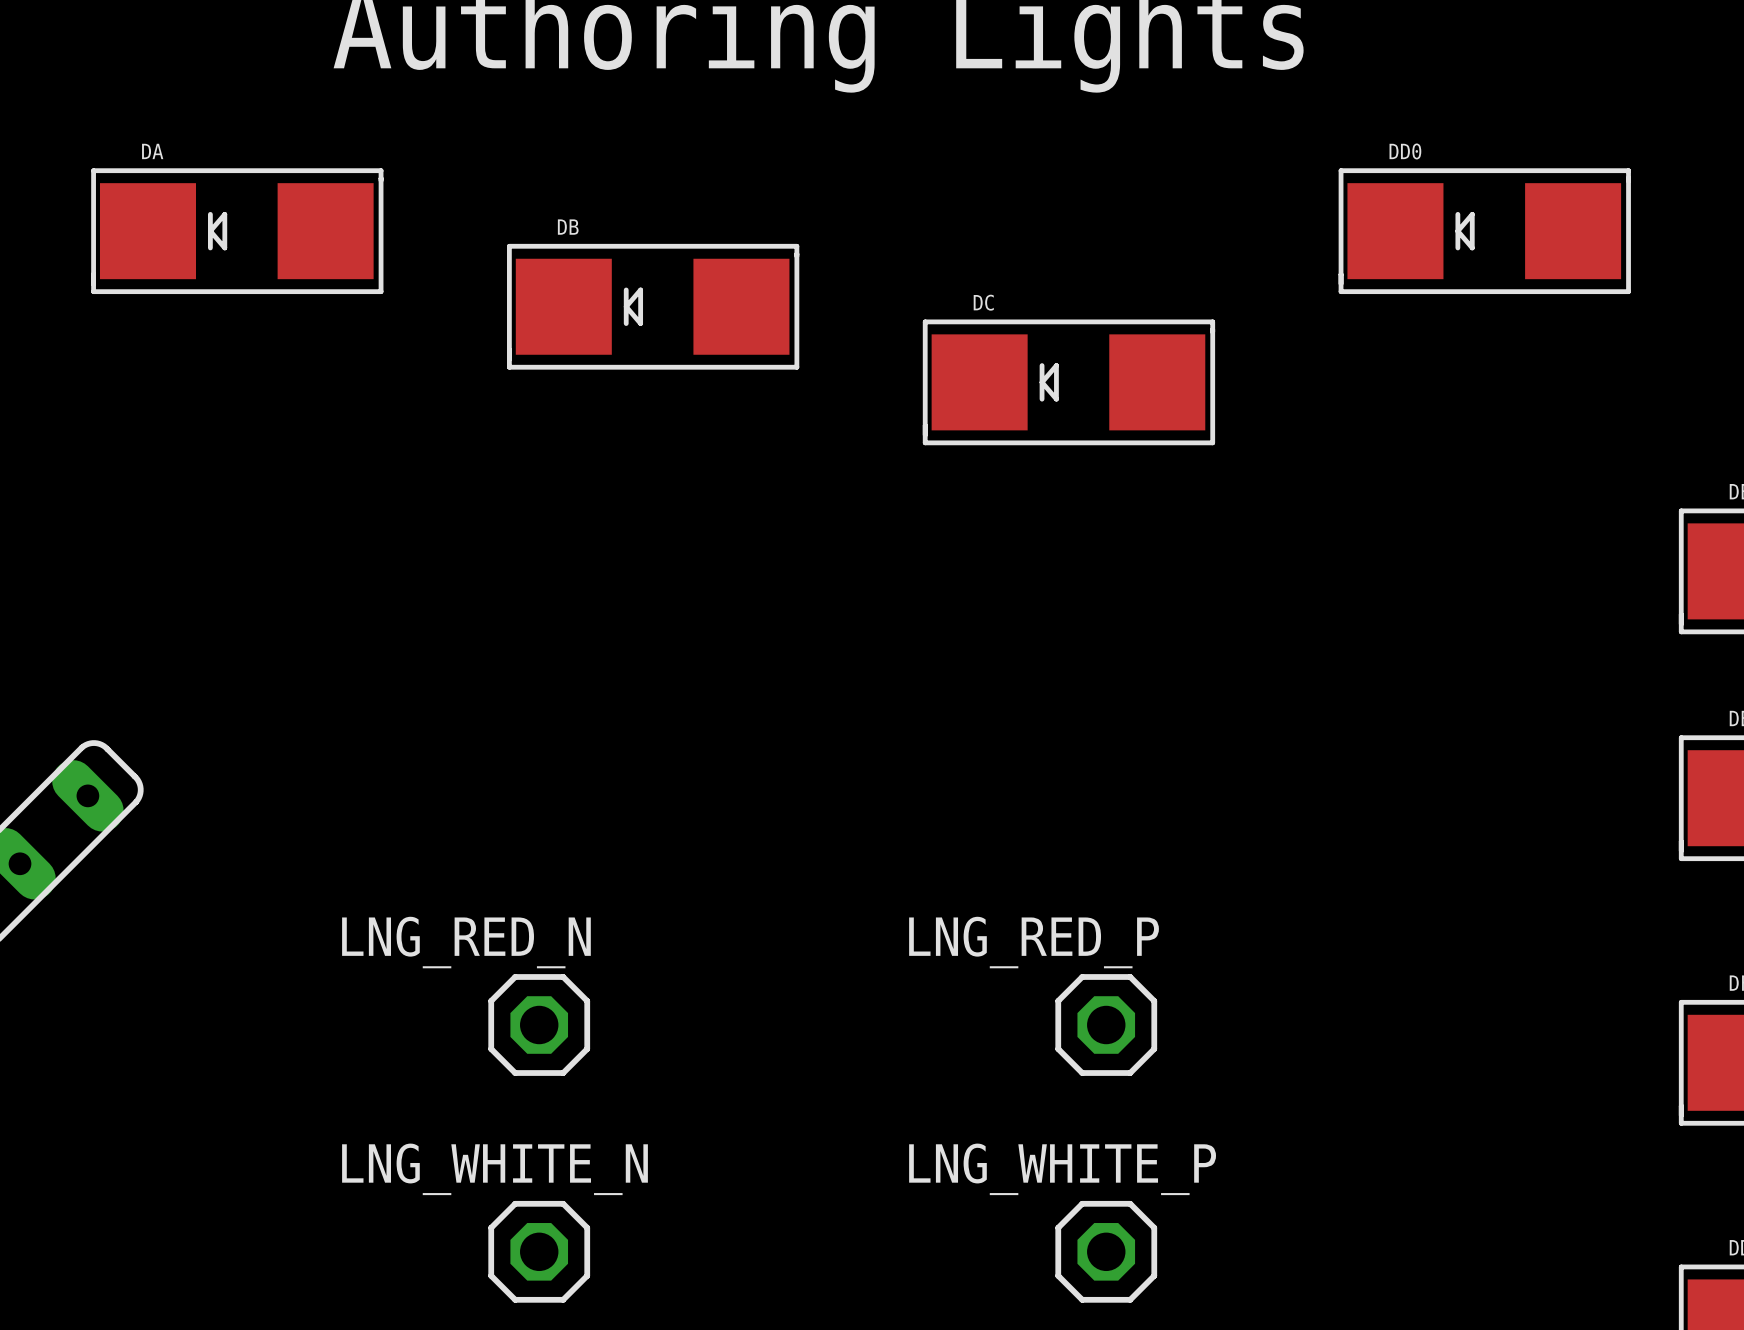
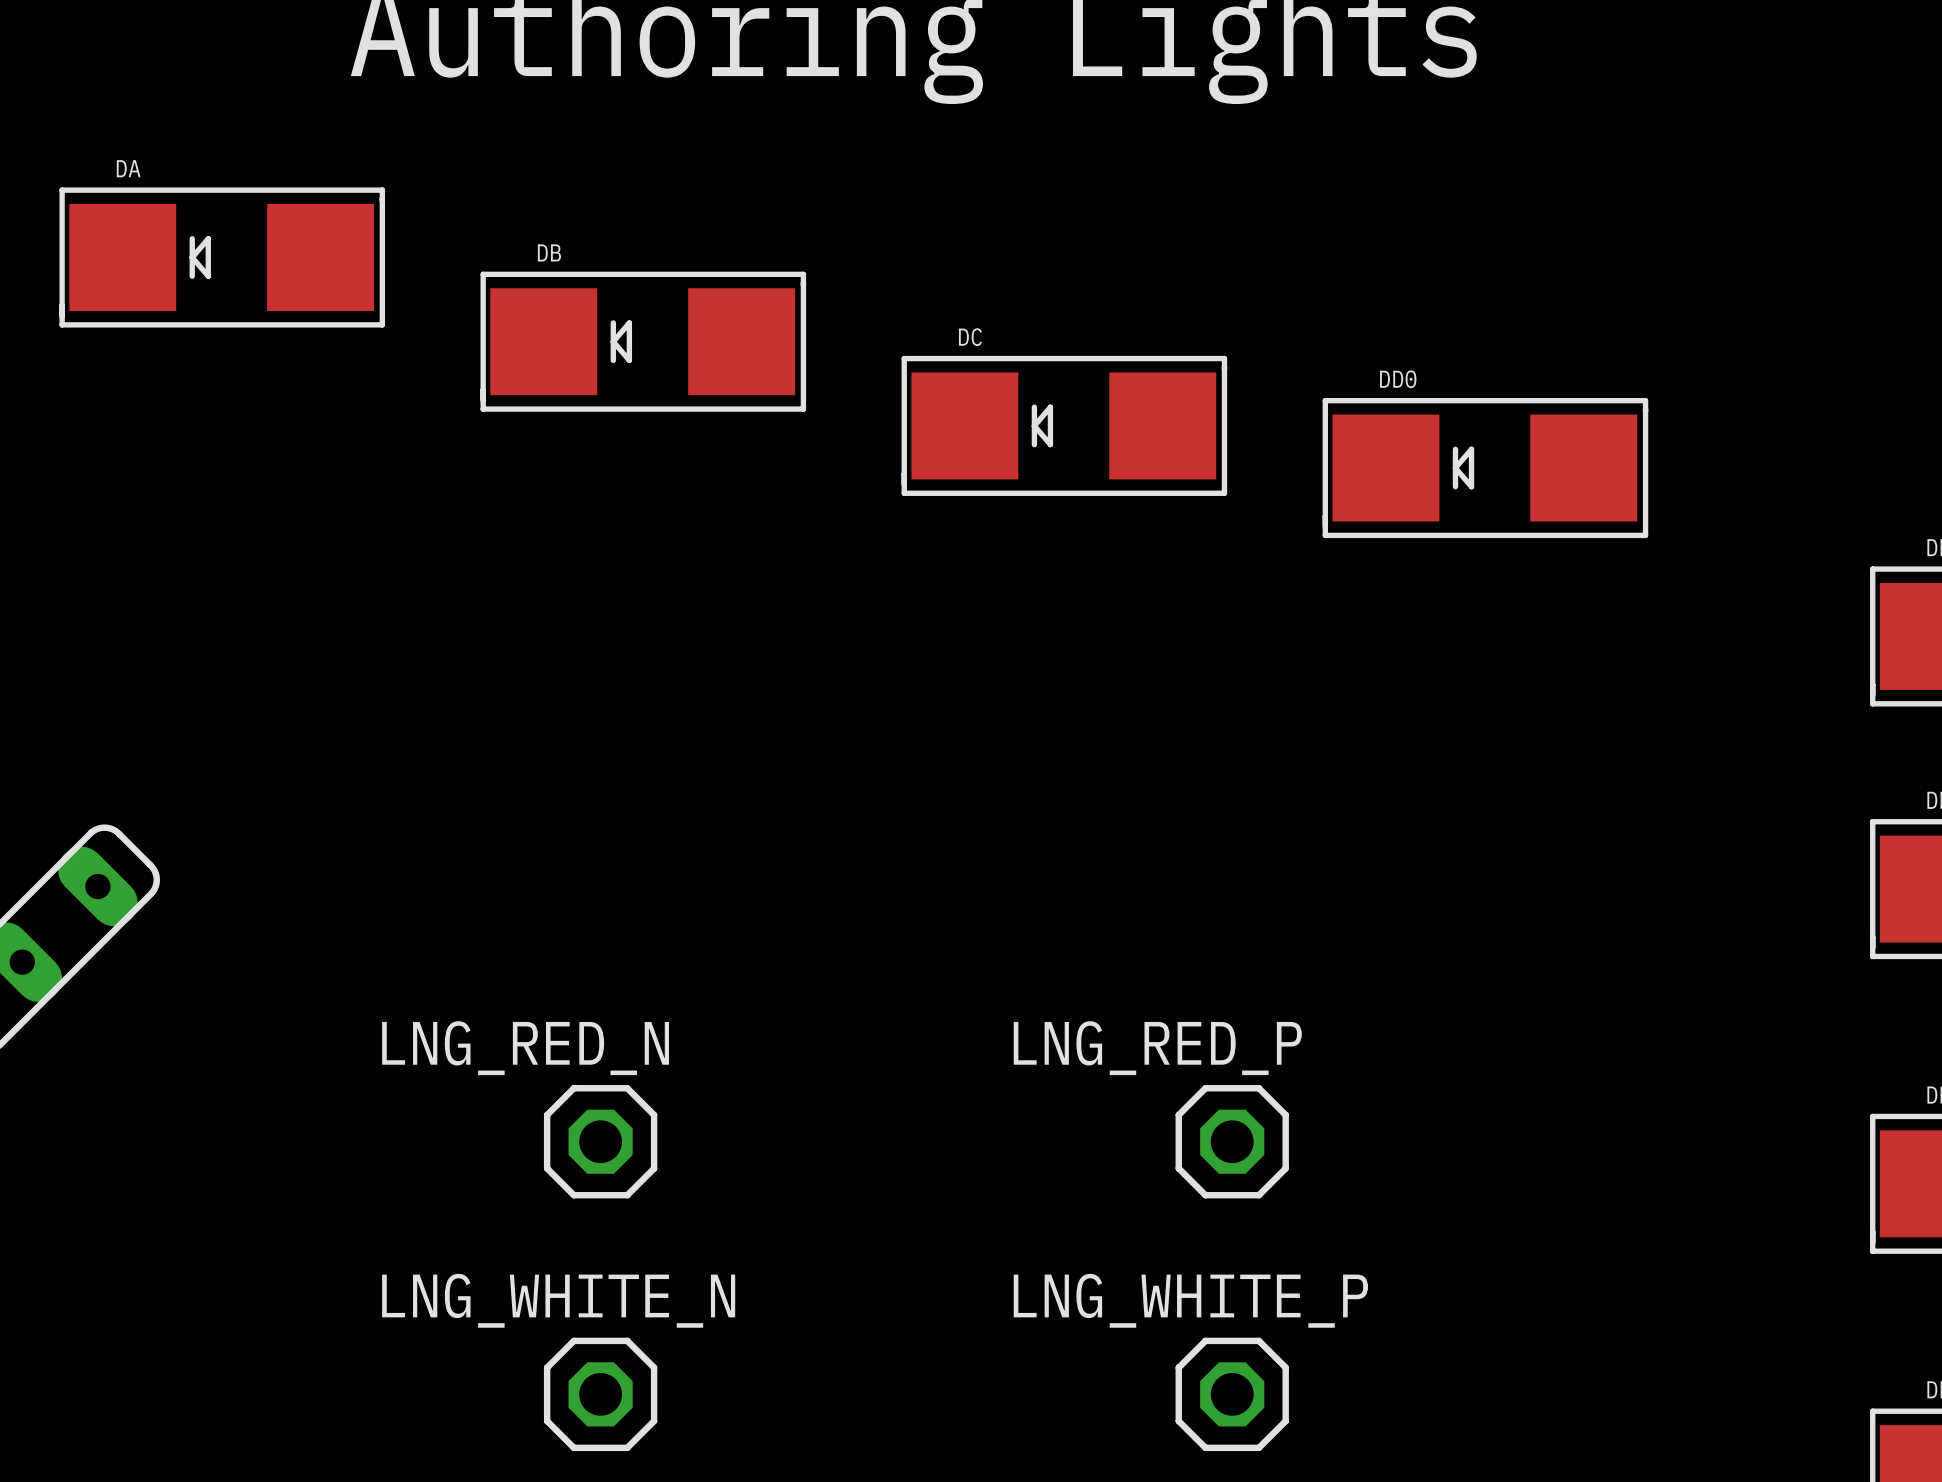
DA position: (237, 231) -> (222, 257)
DD0 position: (1484, 231) -> (1485, 468)
DB position: (653, 306) -> (643, 341)
DC position: (1068, 382) -> (1064, 425)

